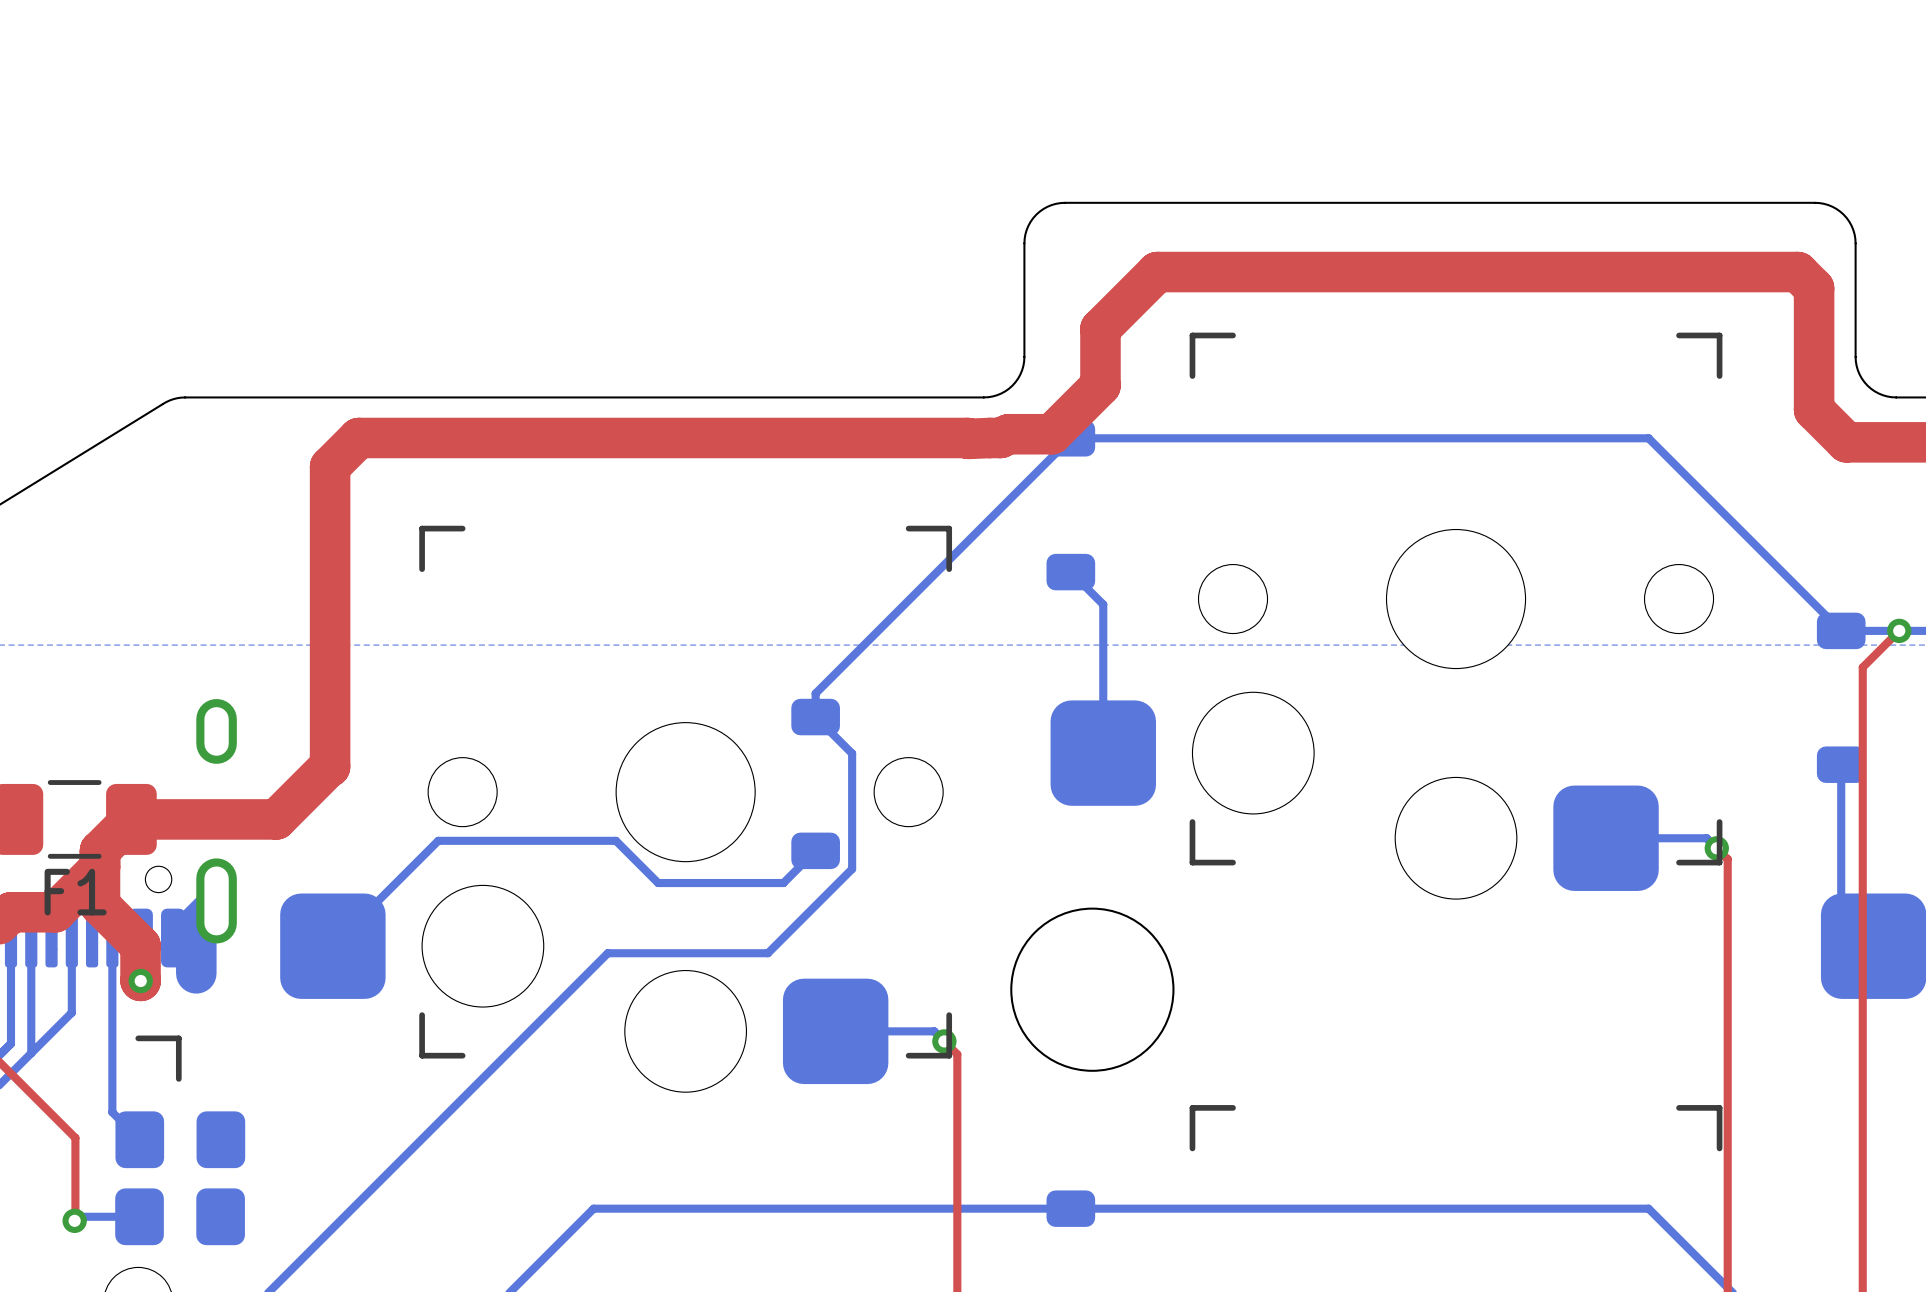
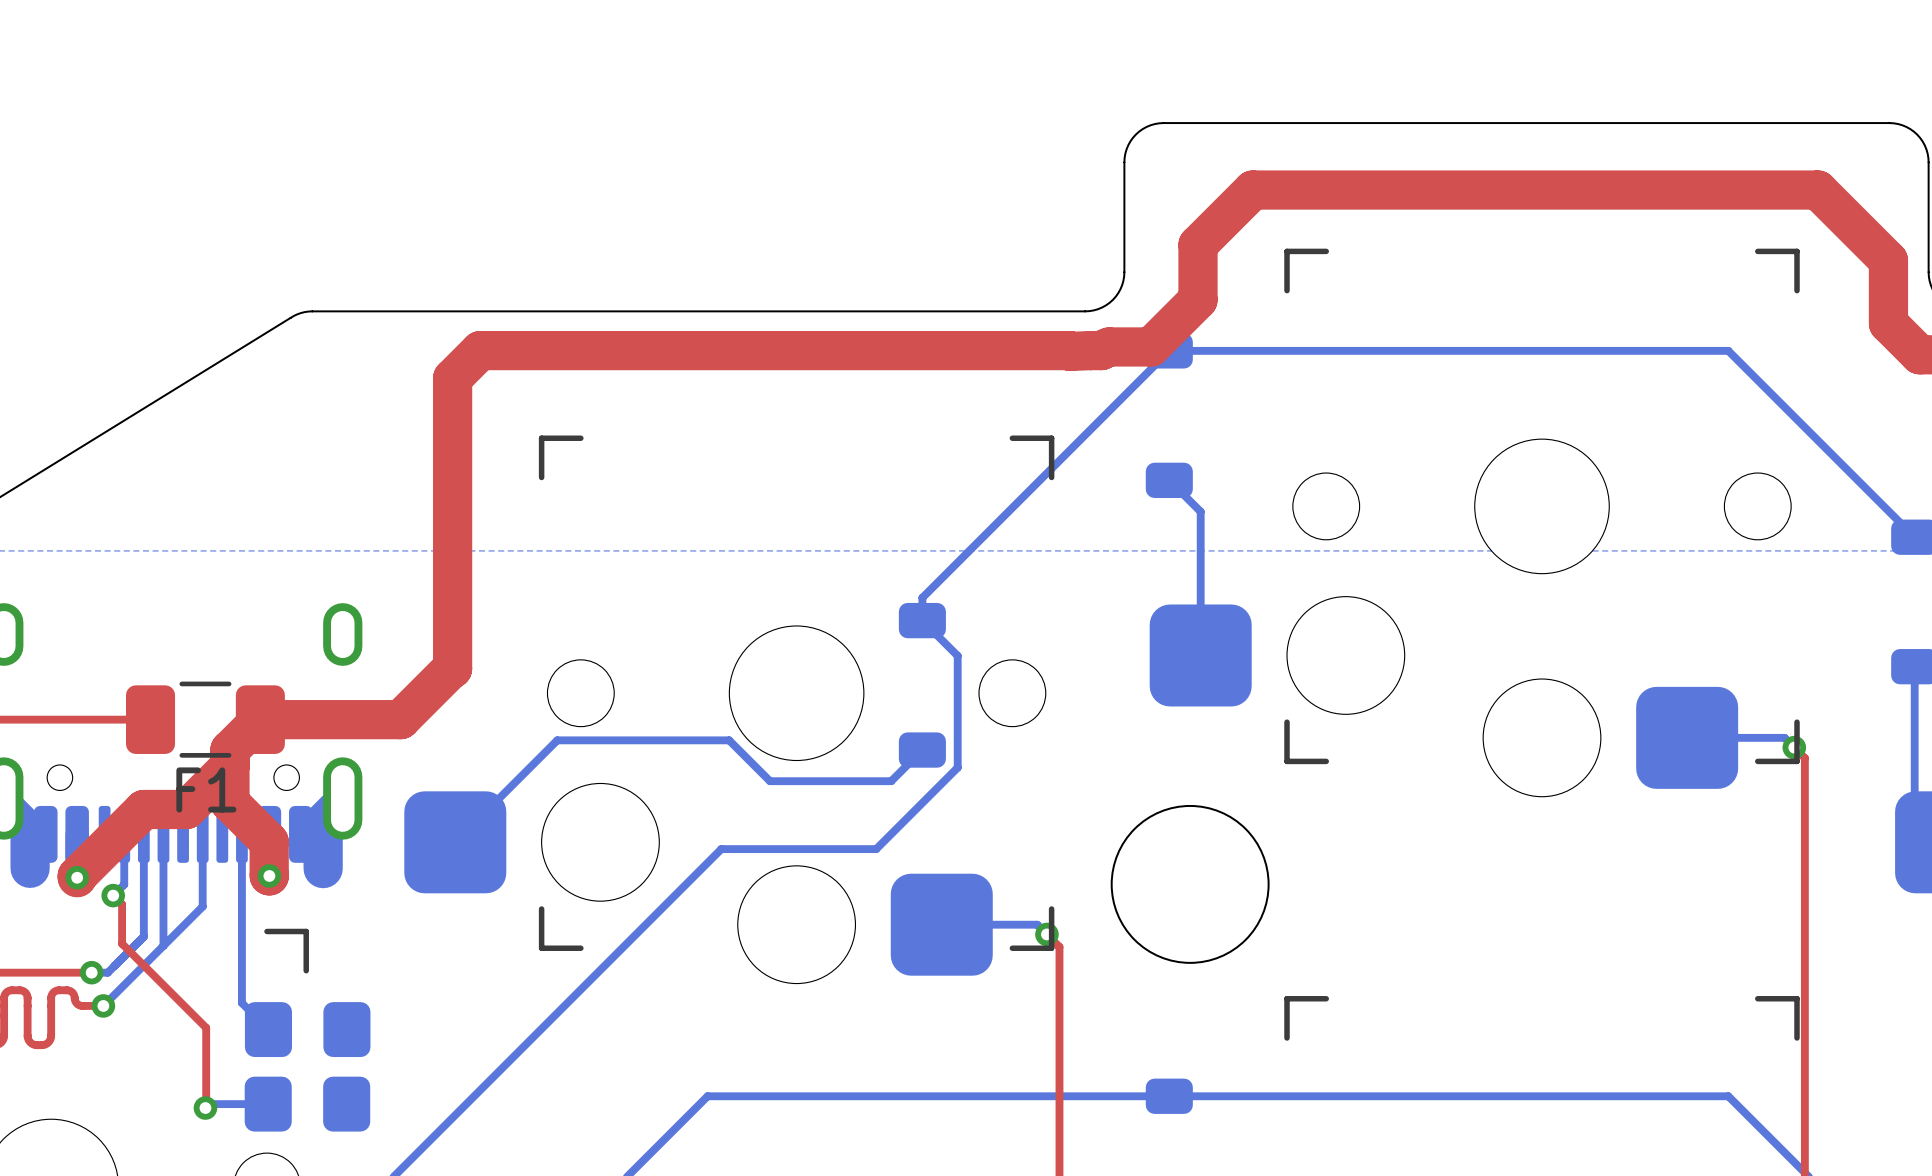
top track: (1741, 272) (1797, 272) (1814, 288) (1814, 345) -> (1817, 190) (1888, 260)

